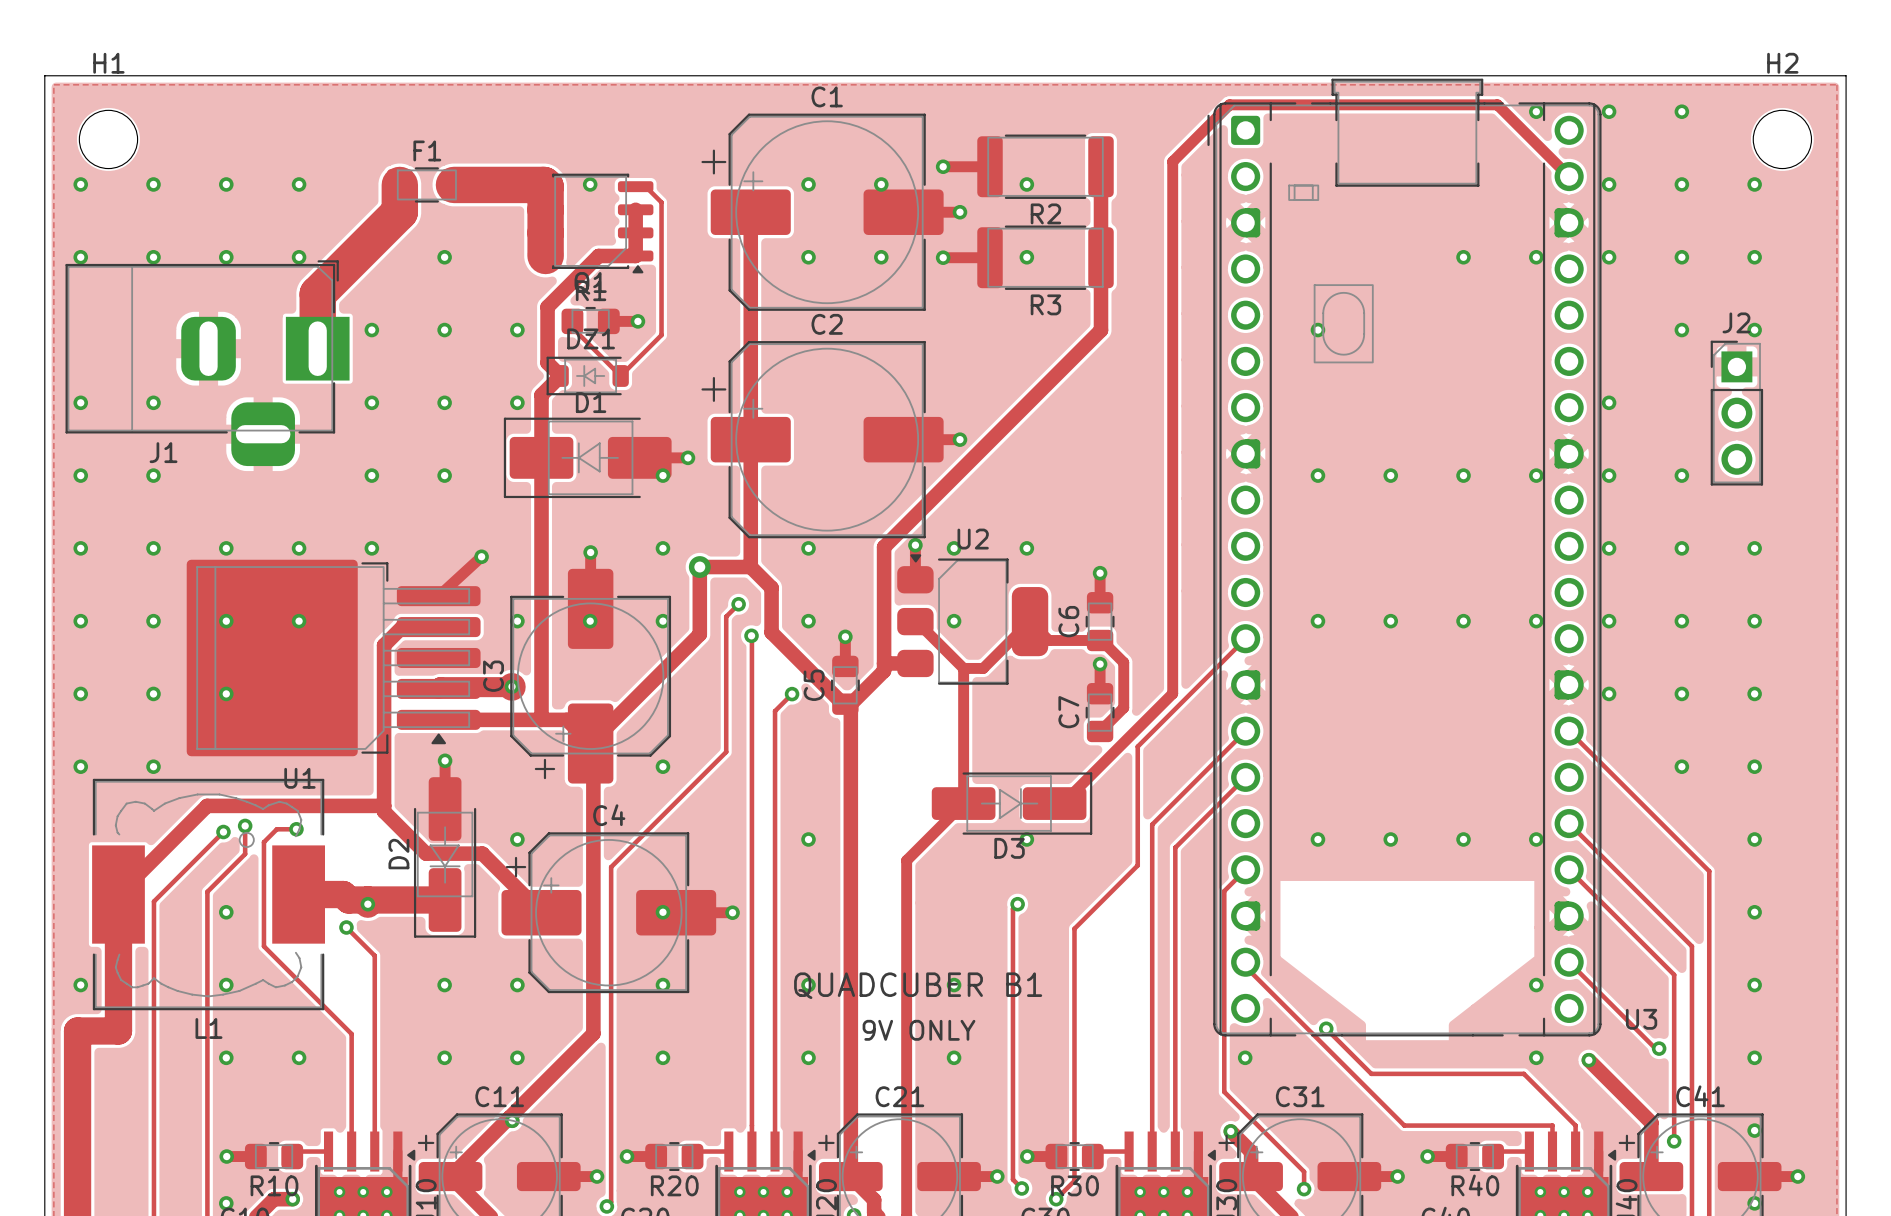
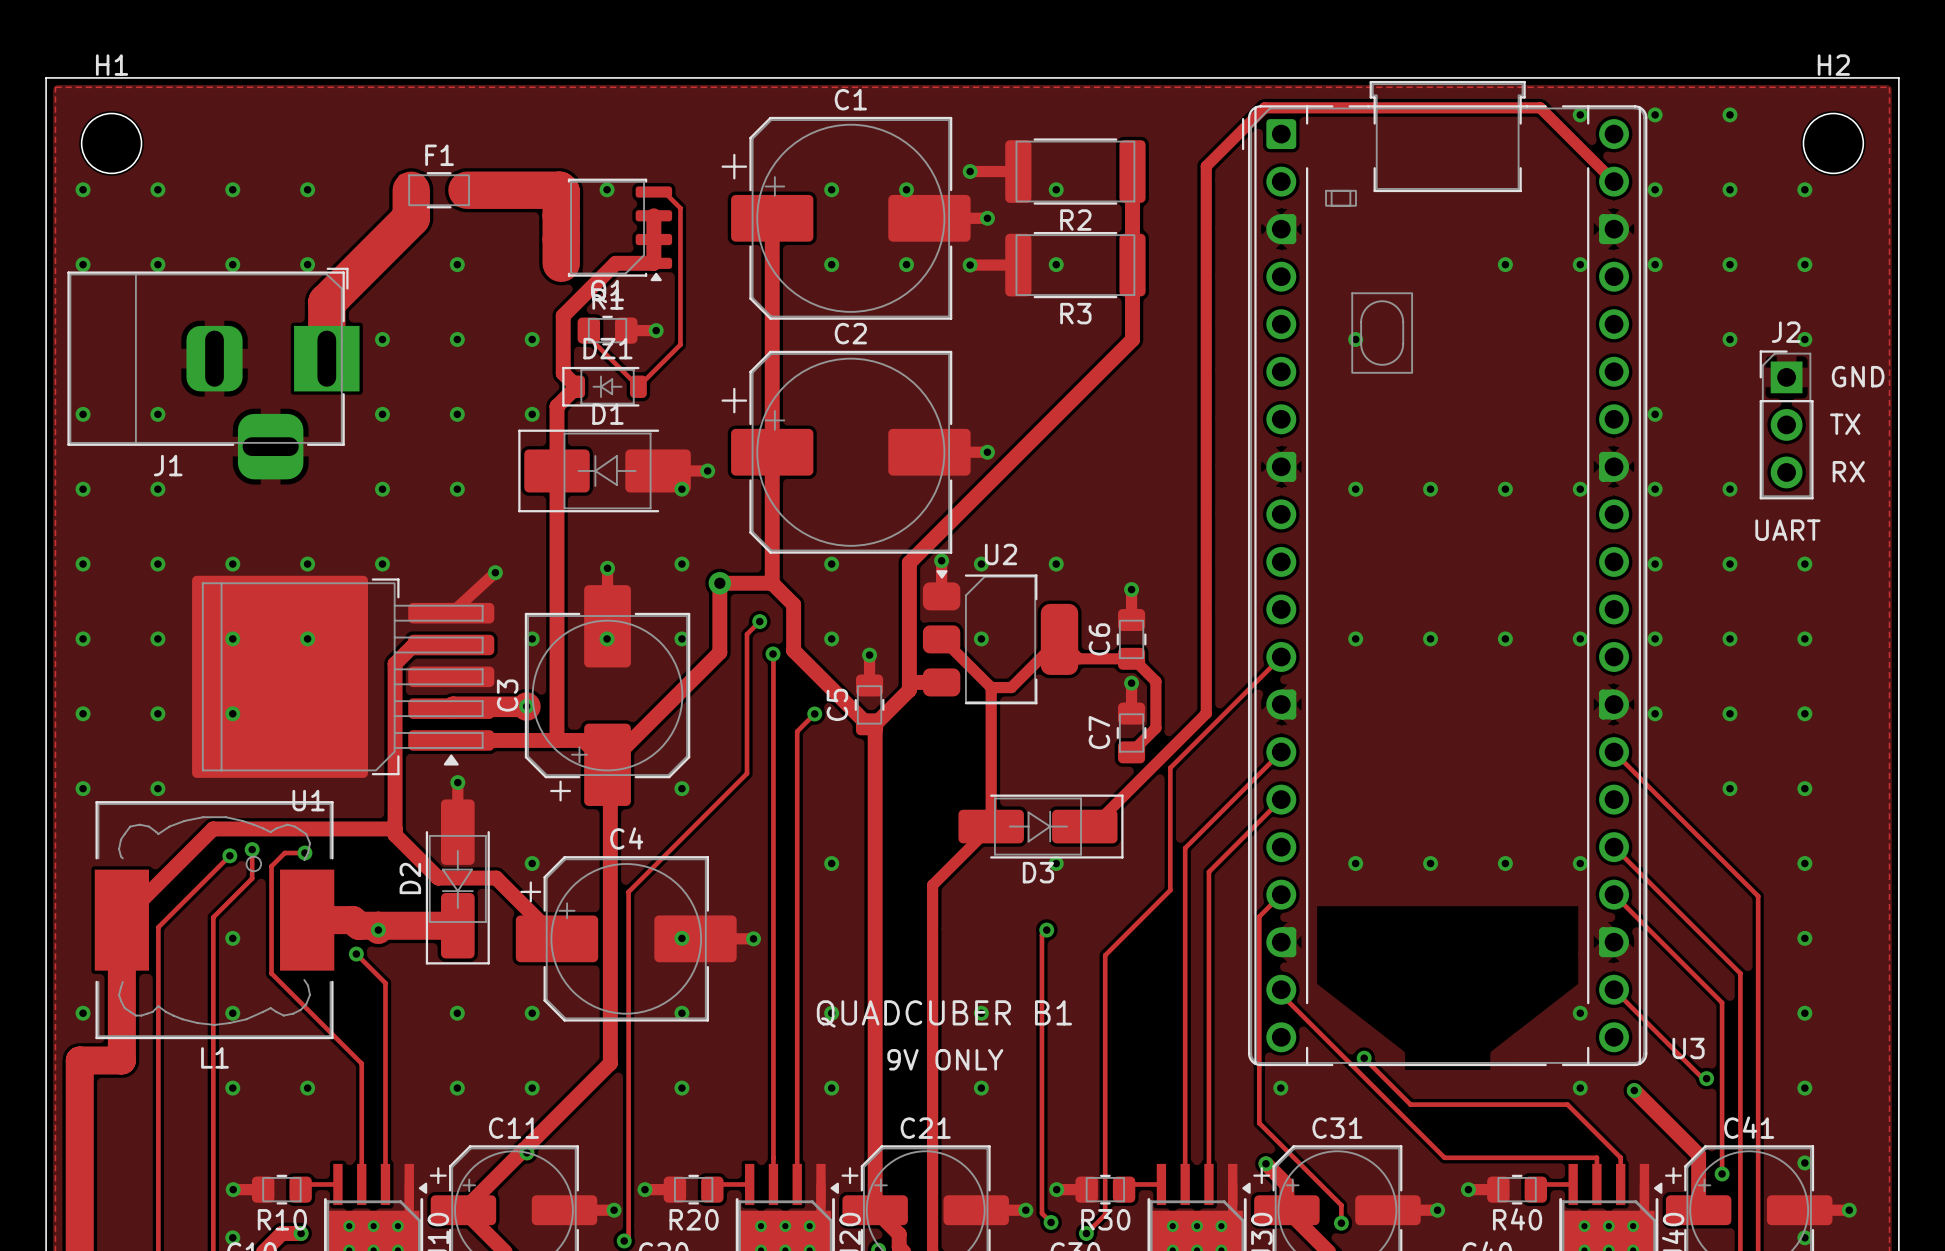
text: none -> GND (1858, 376)
text: none -> TX (1845, 424)
text: none -> RX (1848, 471)
text: none -> UART (1787, 530)

